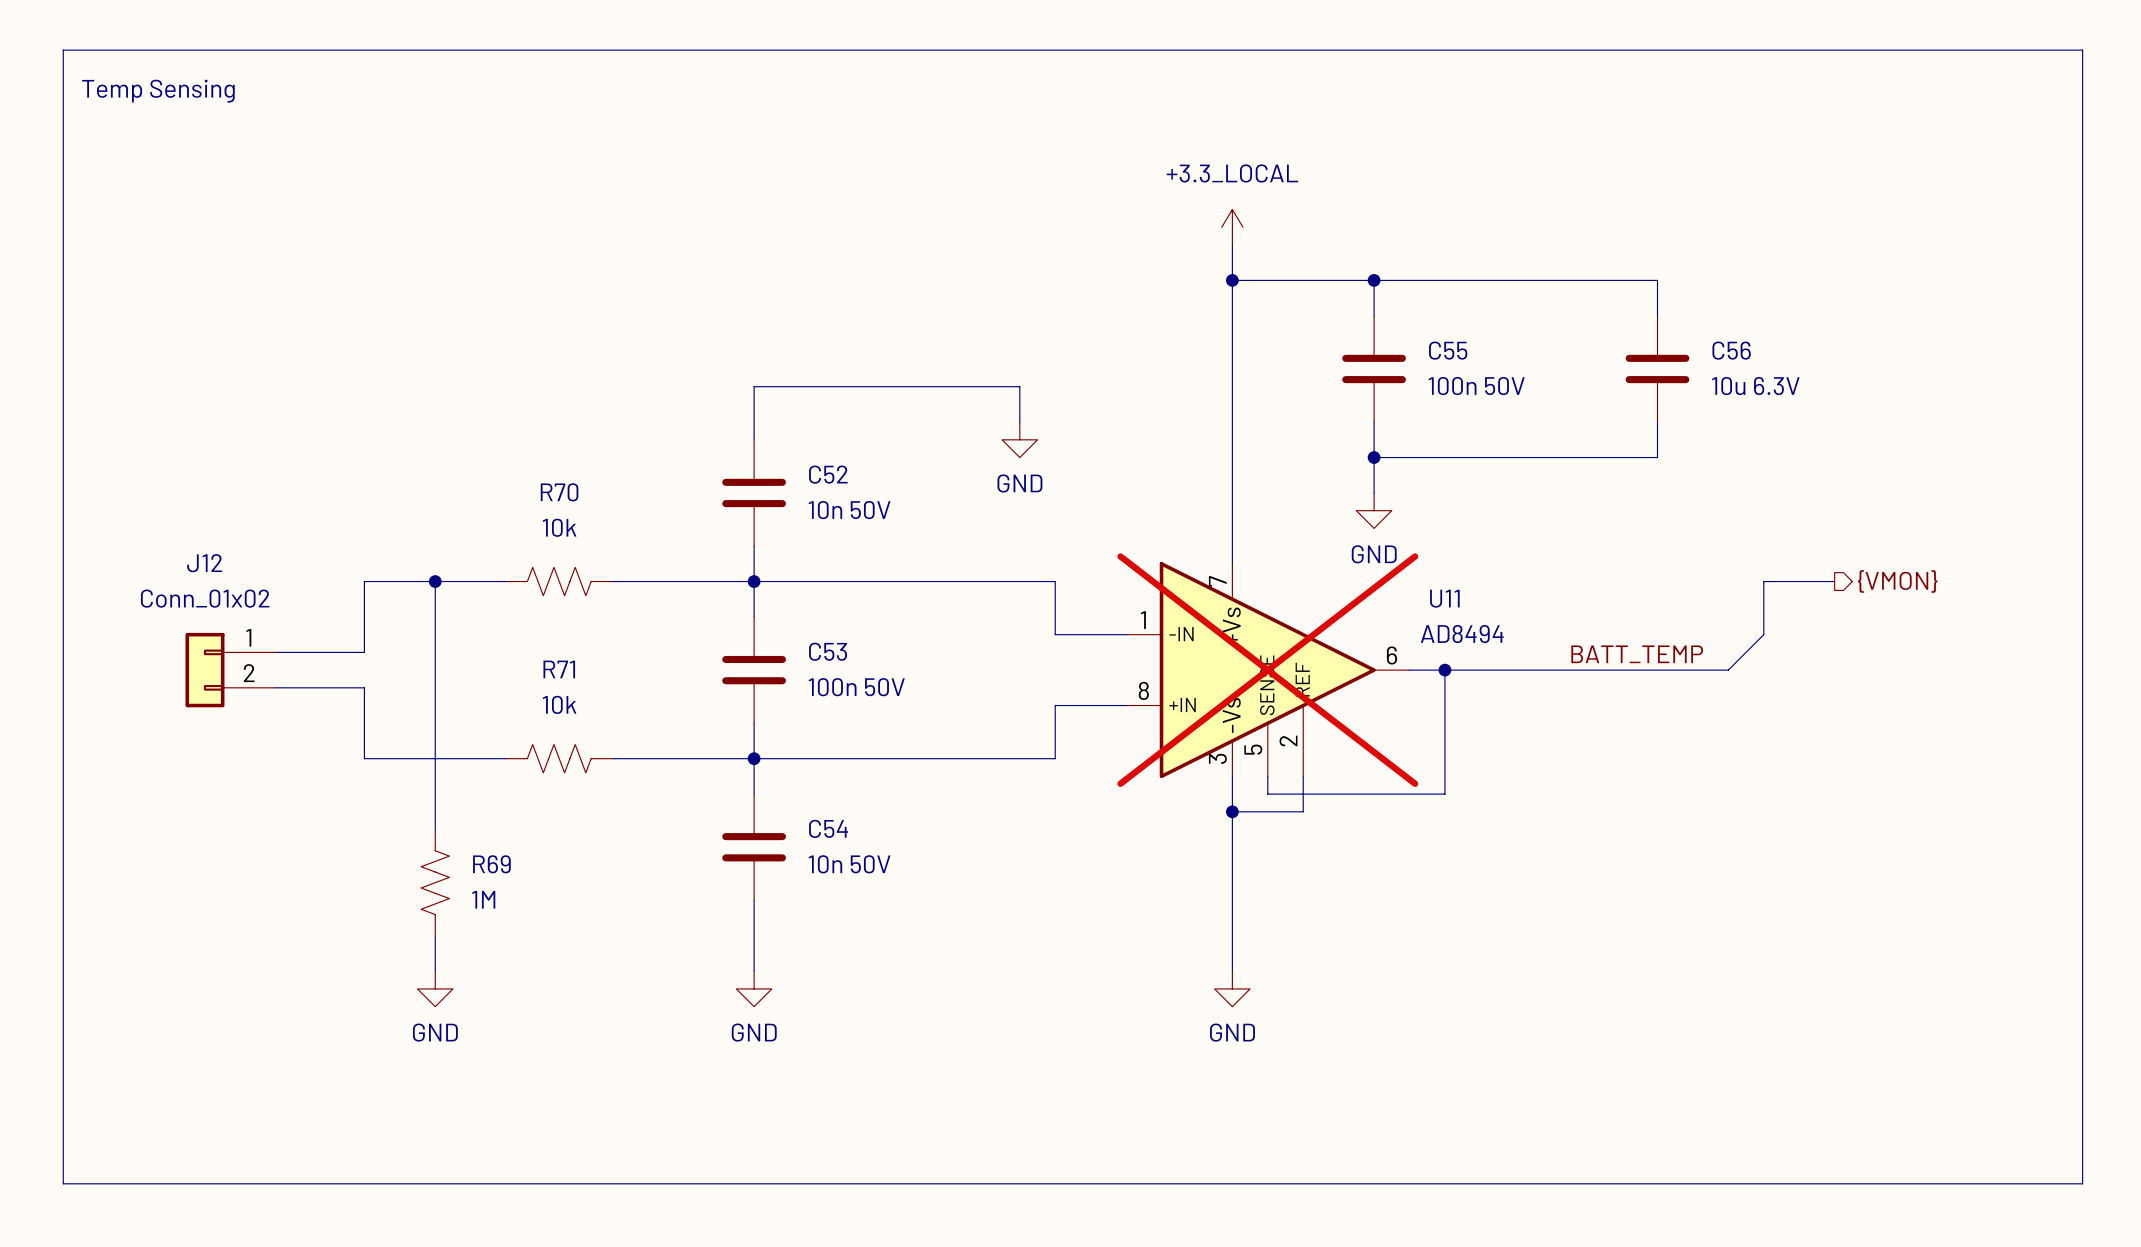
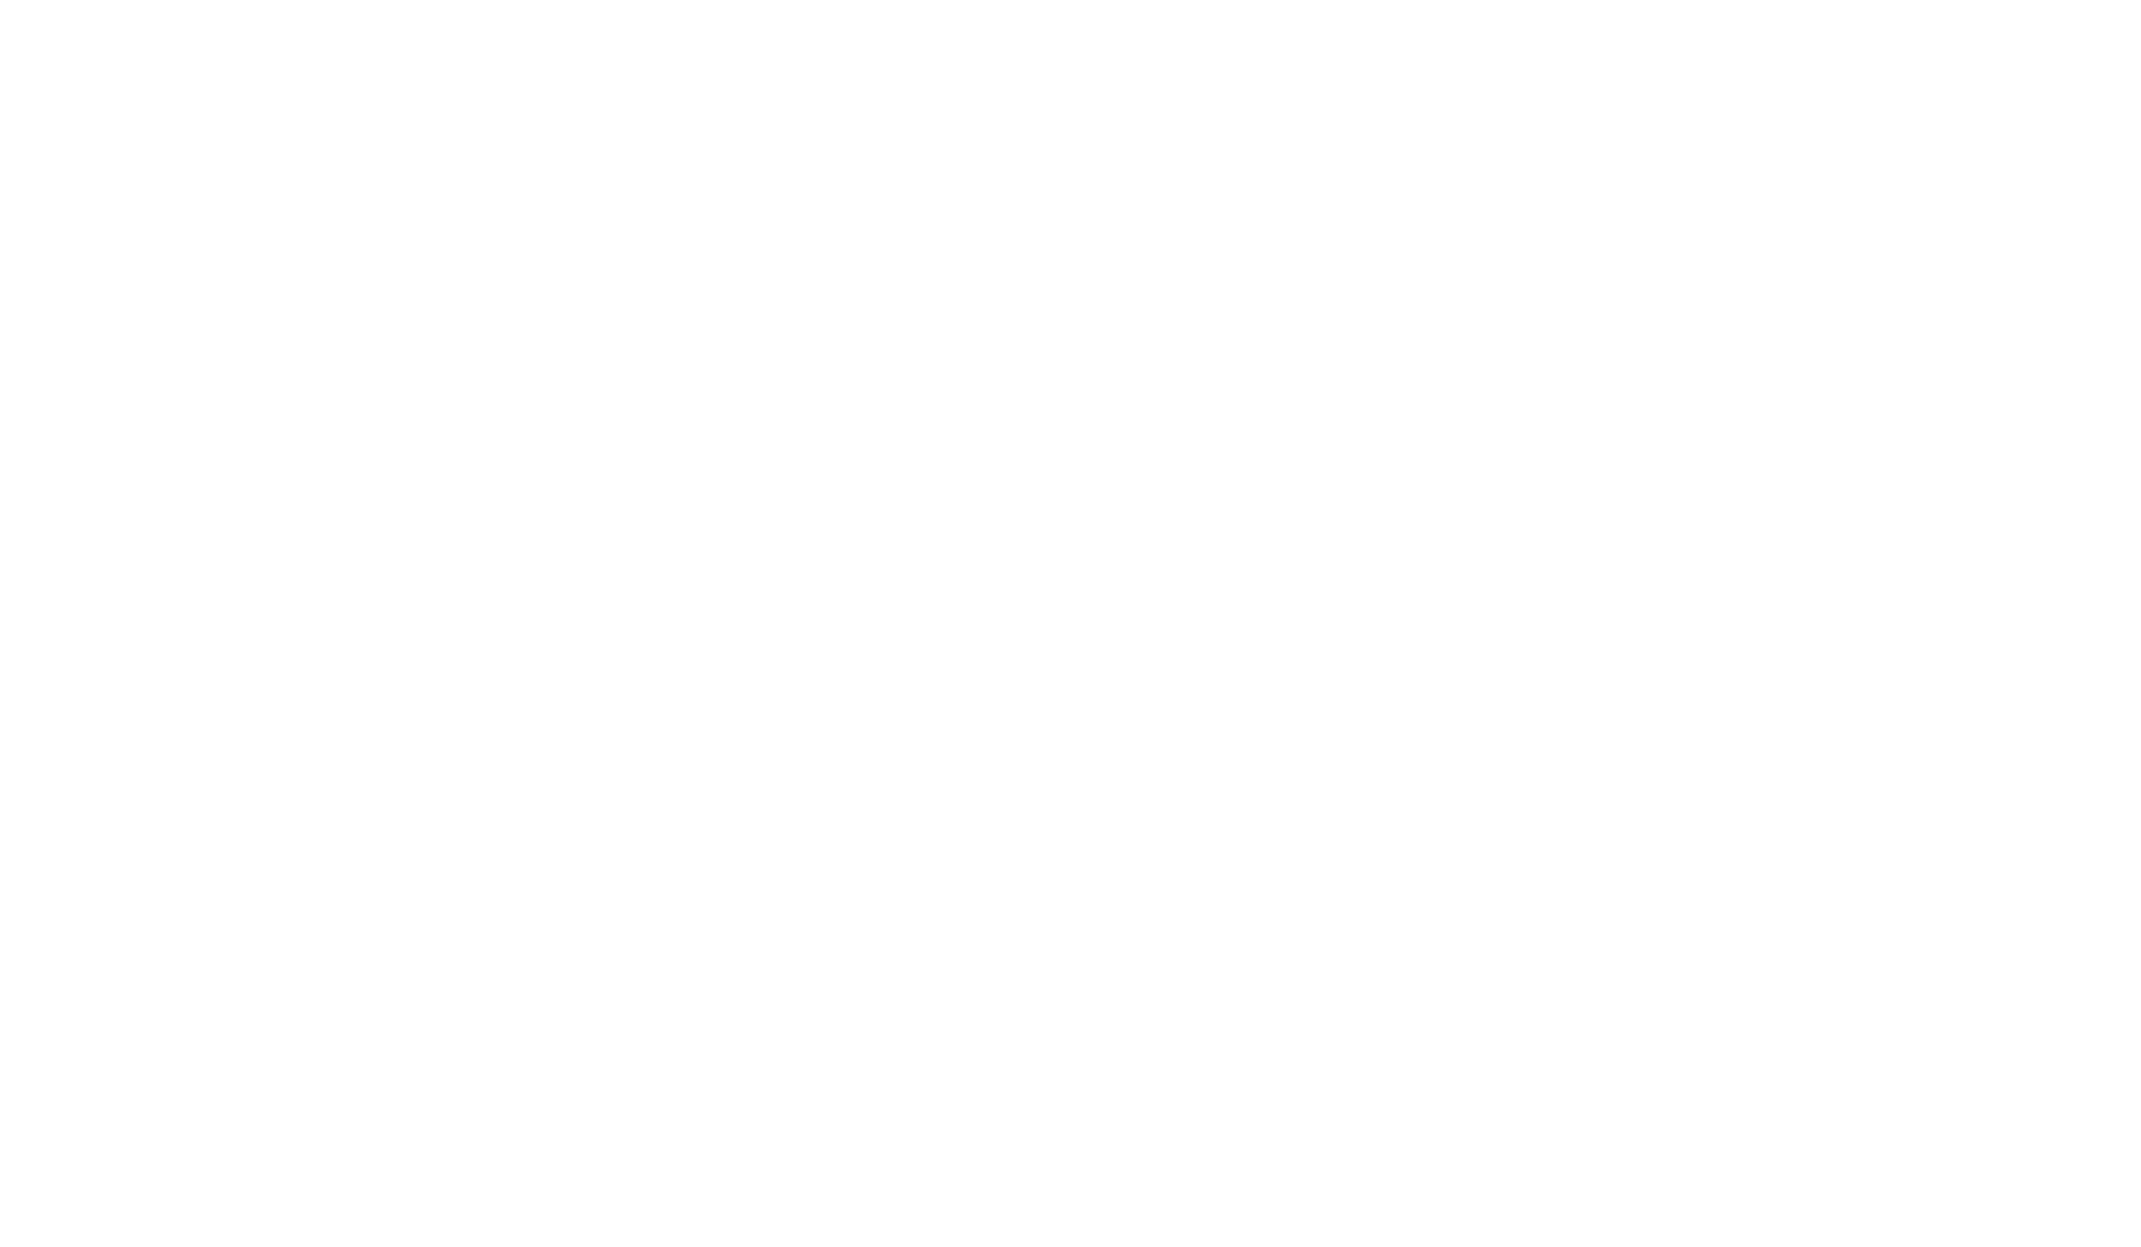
line: (63, 50) (2082, 50) (2082, 1183) (63, 1183) (63, 50) -> none
text: Temp Sensing (158, 91) -> none
power symbol: +3.3_LOCAL (1232, 227) -> none
wire: (1232, 244) (1232, 563) -> none
wire: (1232, 280) (1657, 280) (1657, 315) -> none
junction: (1232, 280) -> none
wire: (1374, 280) (1374, 315) -> none
junction: (1374, 280) -> none
C55: 100n 50V (1374, 368) -> none
C56: 10u 6.3V (1657, 368) -> none
wire: (1019, 422) (1019, 386) (754, 386) (754, 439) -> none
wire: (1374, 422) (1374, 492) -> none
wire: (1657, 422) (1657, 457) (1374, 457) -> none
power symbol: GND (1019, 439) -> none
junction: (1374, 457) -> none
C52: 10n 50V (754, 492) -> none
power symbol: GND (1374, 510) -> none
wire: (754, 546) (754, 616) -> none
wire: (435, 581) (435, 829) -> none
junction: (435, 581) -> none
wire: (506, 581) (364, 581) (364, 652) (275, 652) -> none
R70: 10k (559, 581) -> none
wire: (612, 581) (1055, 581) (1055, 634) (1126, 634) -> none
junction: (754, 581) -> none
bus: (1834, 581) (1763, 581) (1763, 634) -> none
hierarchical label: {VMON} (1897, 581) -> none
wire: (1763, 634) (1728, 670) (1409, 670) -> none
label: BATT_TEMP (1637, 654) -> none
J12: Conn_01x02 (230, 670) -> none
C53: 100n 50V (754, 670) -> none
U11: AD8494 (1267, 670) -> none
wire: (1444, 670) (1444, 794) (1267, 794) (1267, 776) -> none
junction: (1444, 670) -> none
wire: (275, 687) (364, 687) (364, 758) (506, 758) -> none
wire: (1126, 705) (1055, 705) (1055, 758) (612, 758) -> none
wire: (754, 723) (754, 794) -> none
R71: 10k (559, 758) -> none
junction: (754, 758) -> none
wire: (1232, 776) (1232, 971) -> none
wire: (1303, 776) (1303, 811) (1232, 811) -> none
junction: (1232, 811) -> none
C54: 10n 50V (754, 847) -> none
R69: 1M (435, 882) -> none
wire: (754, 900) (754, 971) -> none
wire: (435, 935) (435, 971) -> none
power symbol: GND (435, 988) -> none
power symbol: GND (754, 988) -> none
power symbol: GND (1232, 988) -> none

